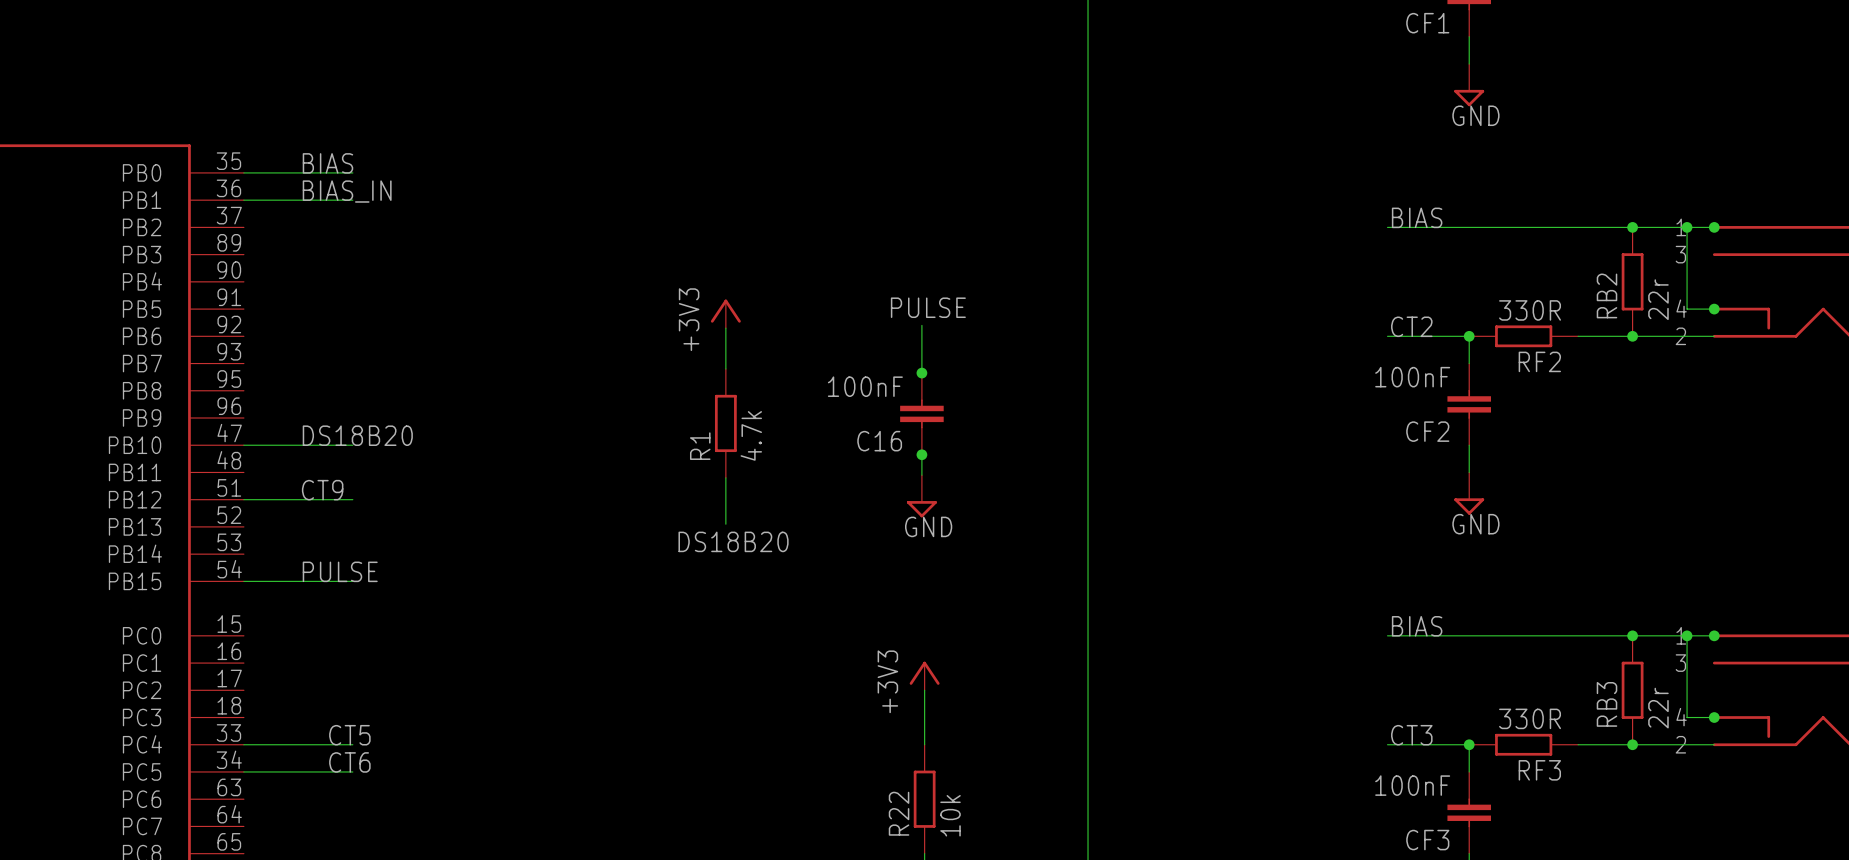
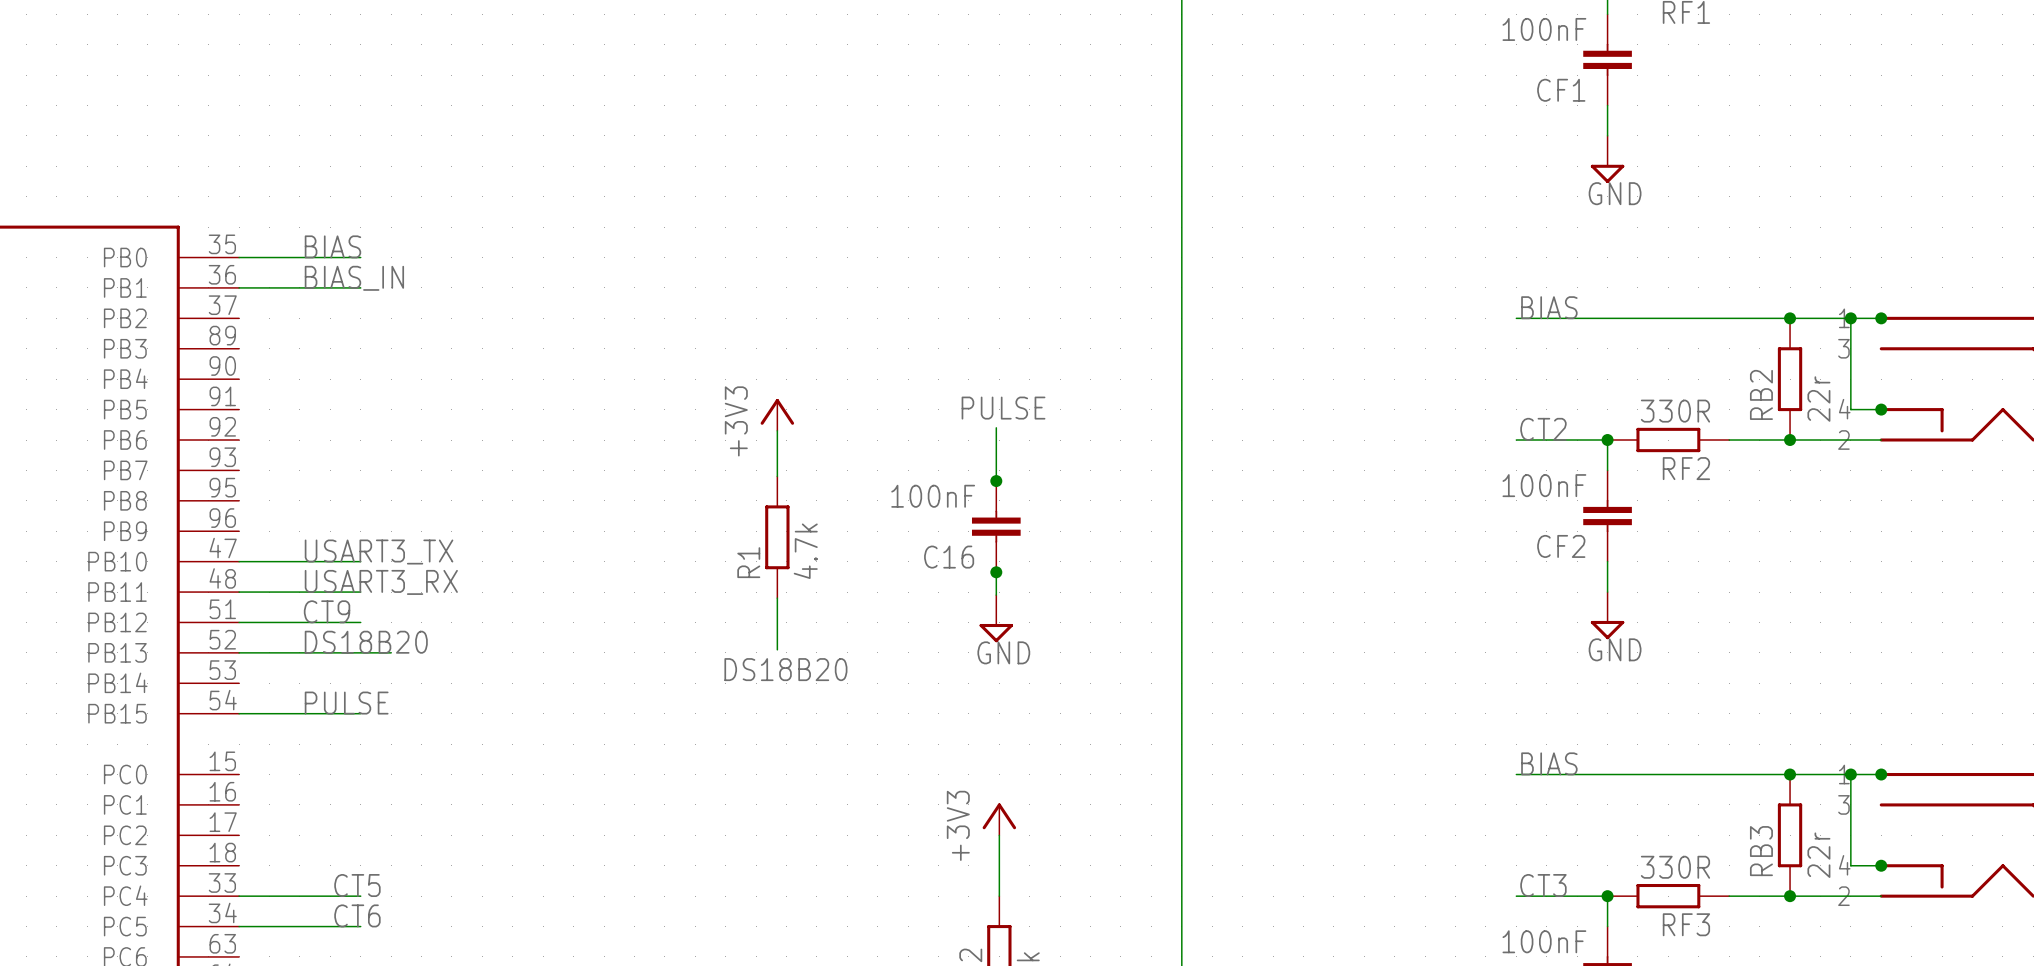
label: DS18B20 (357, 435) -> USART3_TX (379, 552)
label: none -> USART3_RX (381, 582)
wire: none -> (239, 592) (360, 592)
label: none -> DS18B20 (366, 642)
wire: none -> (239, 652) (391, 652)

